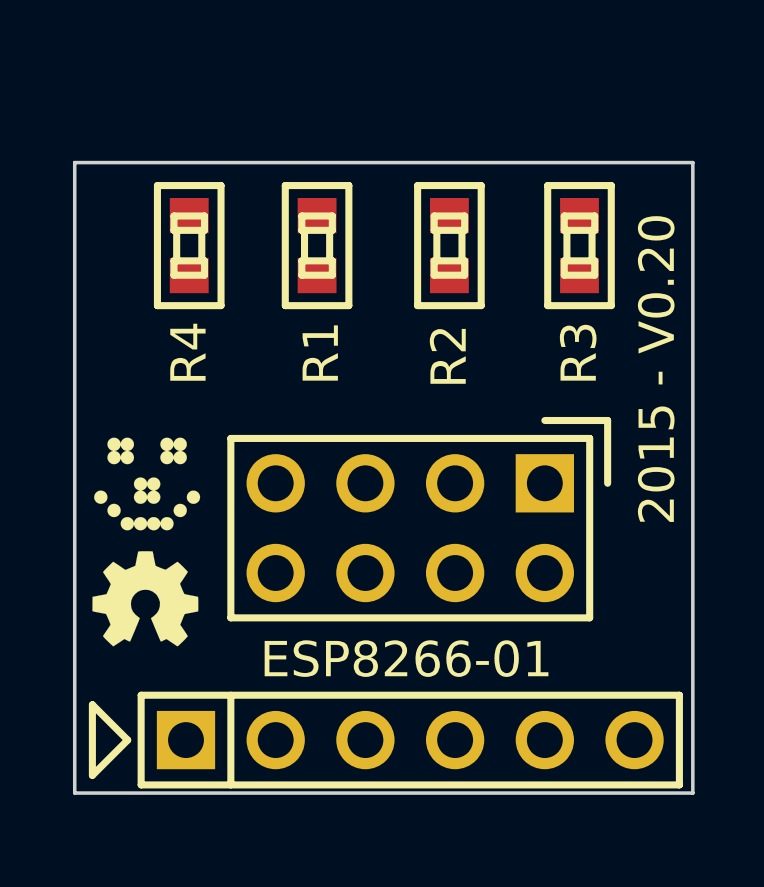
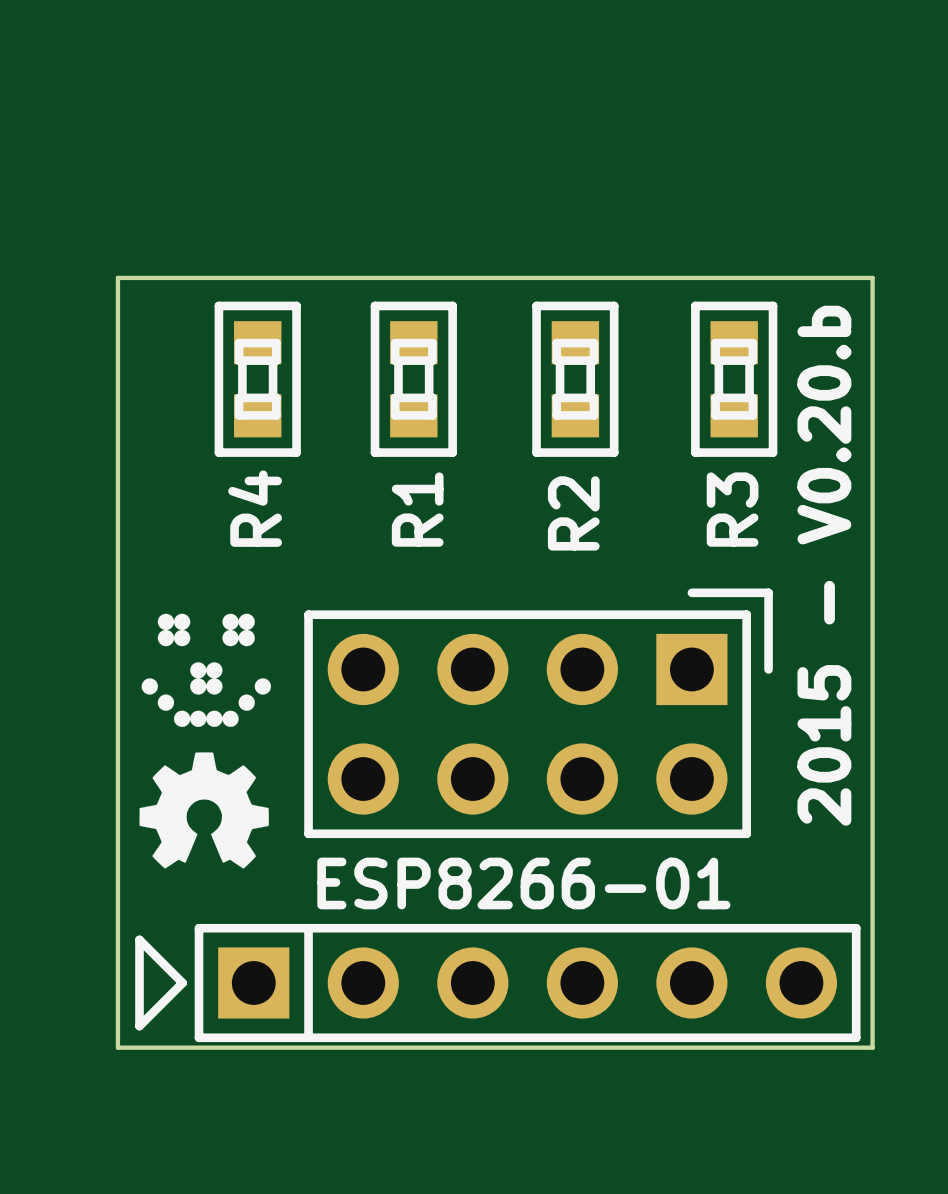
text: 2015 - V0.20 (656, 369) -> 2015 - V0.20.b (824, 565)

